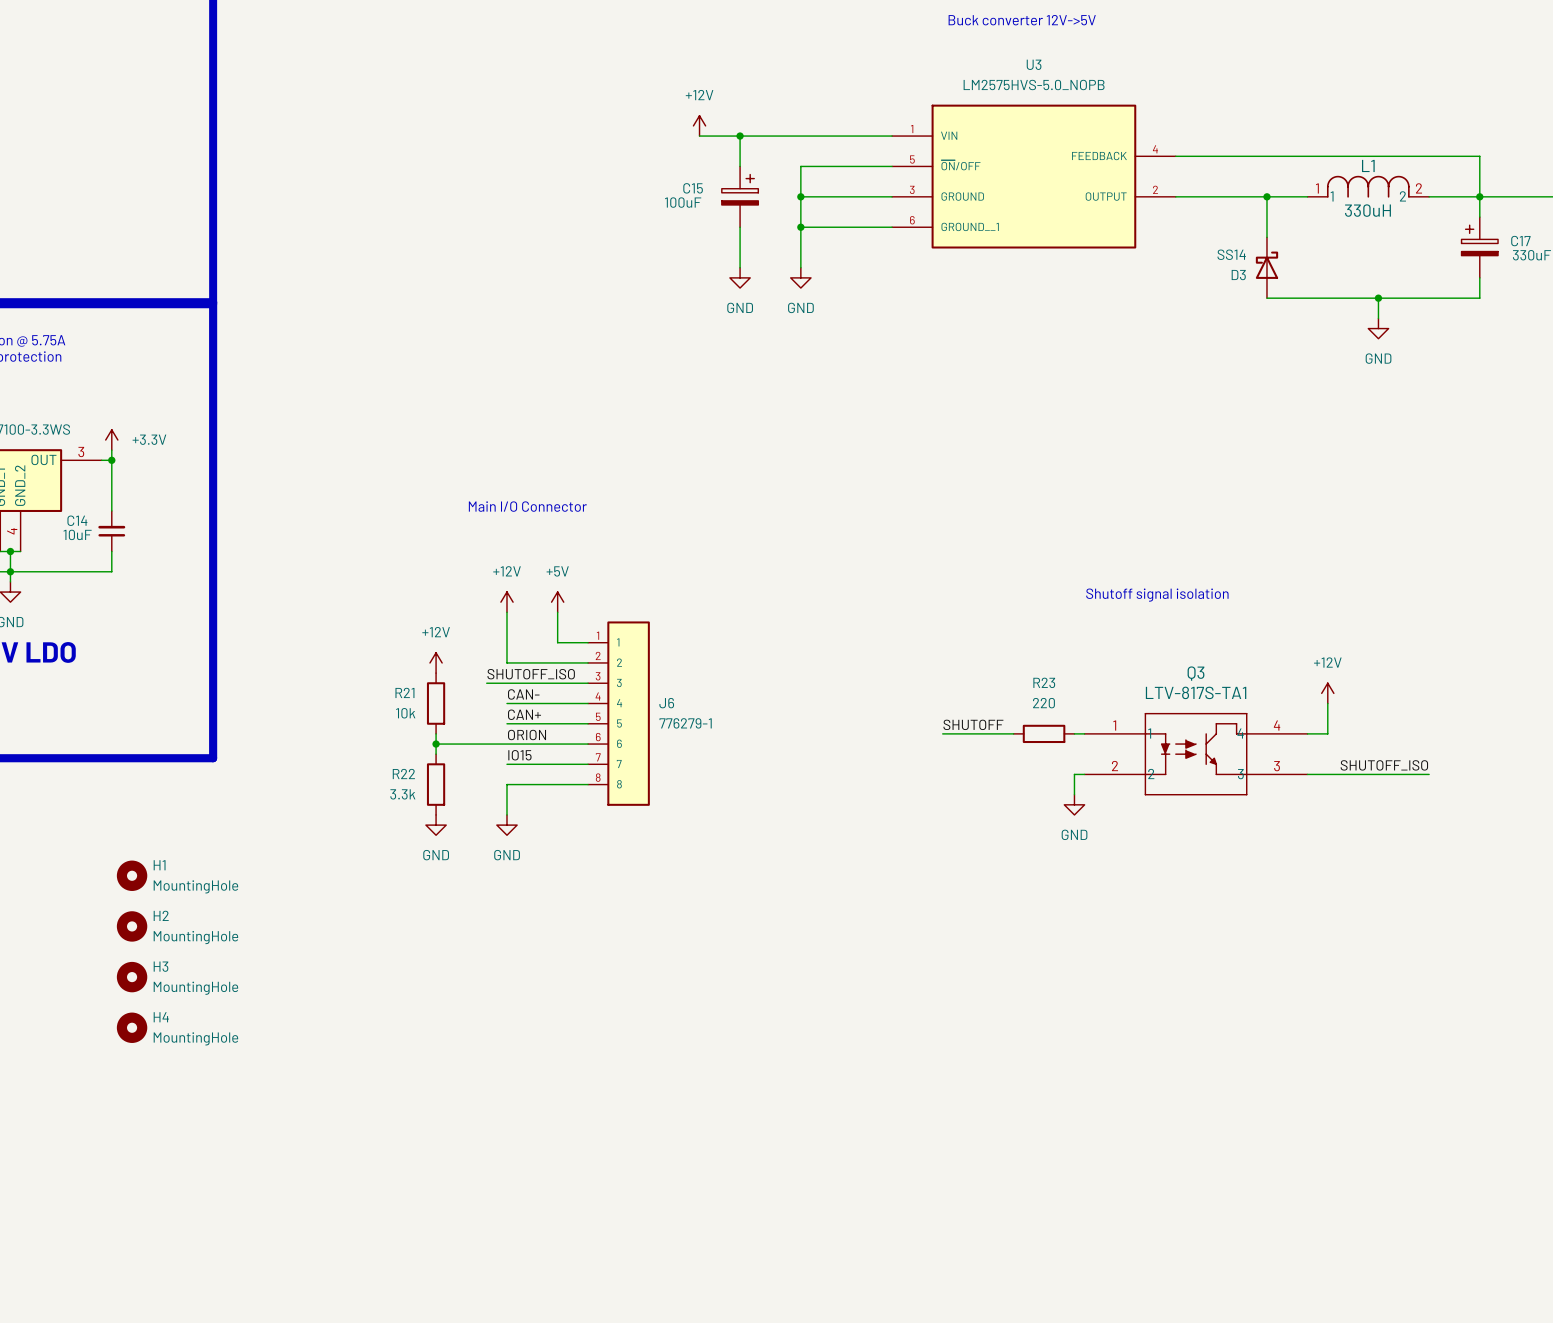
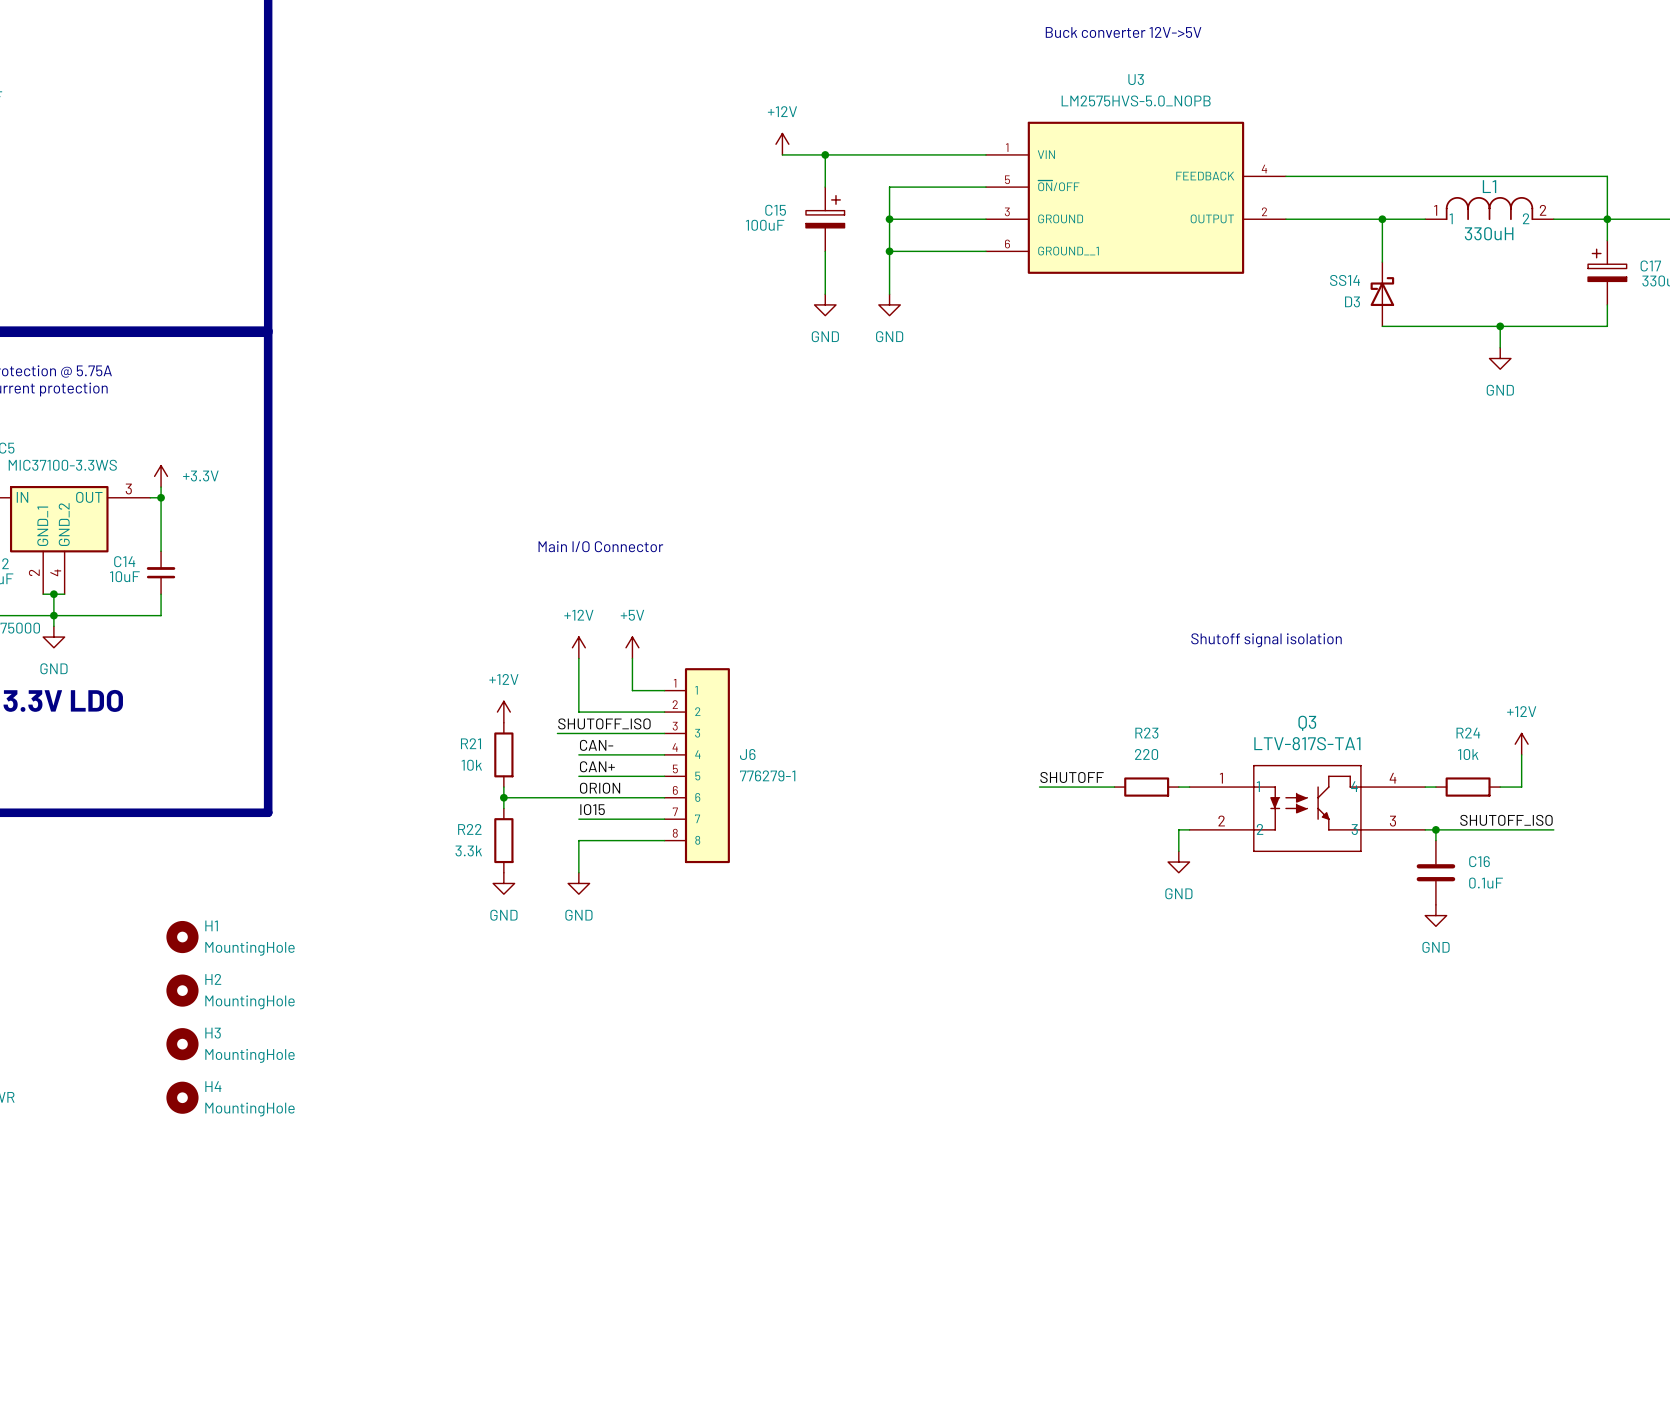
power symbol position: +12V (1327, 693) -> +12V (1521, 744)
wire: (1327, 703) (1327, 733) (1317, 733) -> none
wire: none -> (1521, 754) (1521, 787) (1500, 787)
R24: none -> 10k (1468, 787)
wire: none -> (1435, 829) (1435, 840)
junction: none -> (1435, 829)
C16: none -> 0.1uF (1435, 872)
power symbol: none -> GND (1435, 915)

